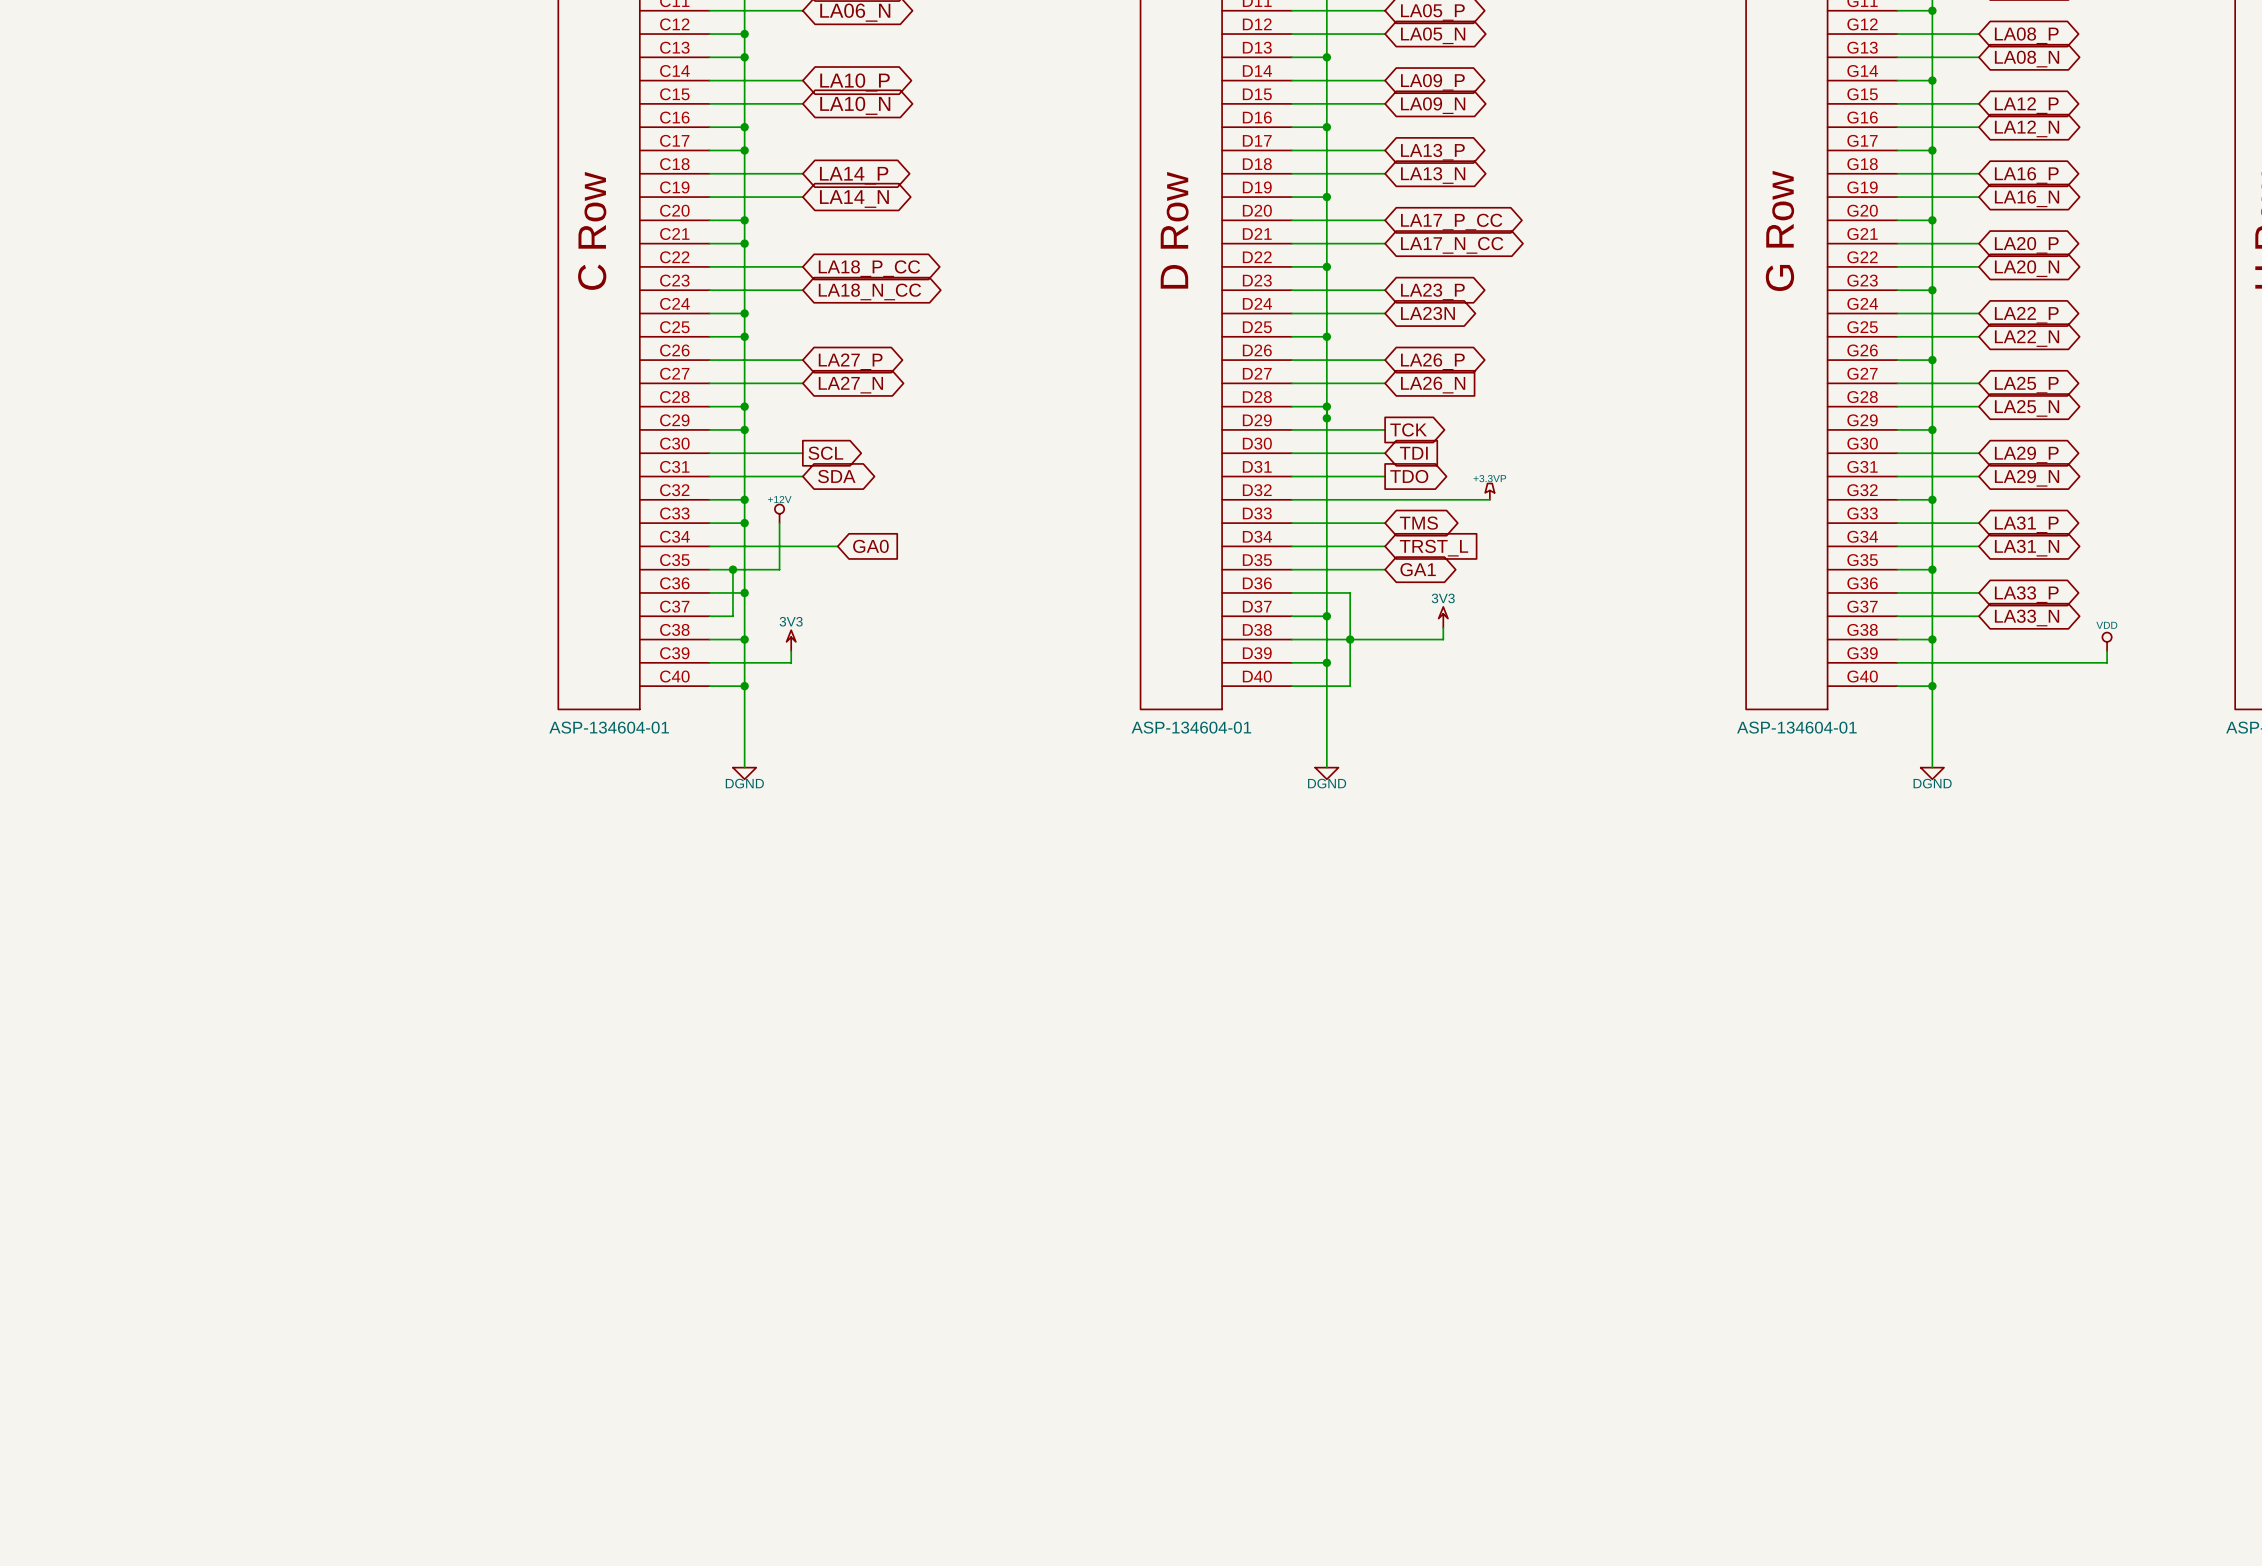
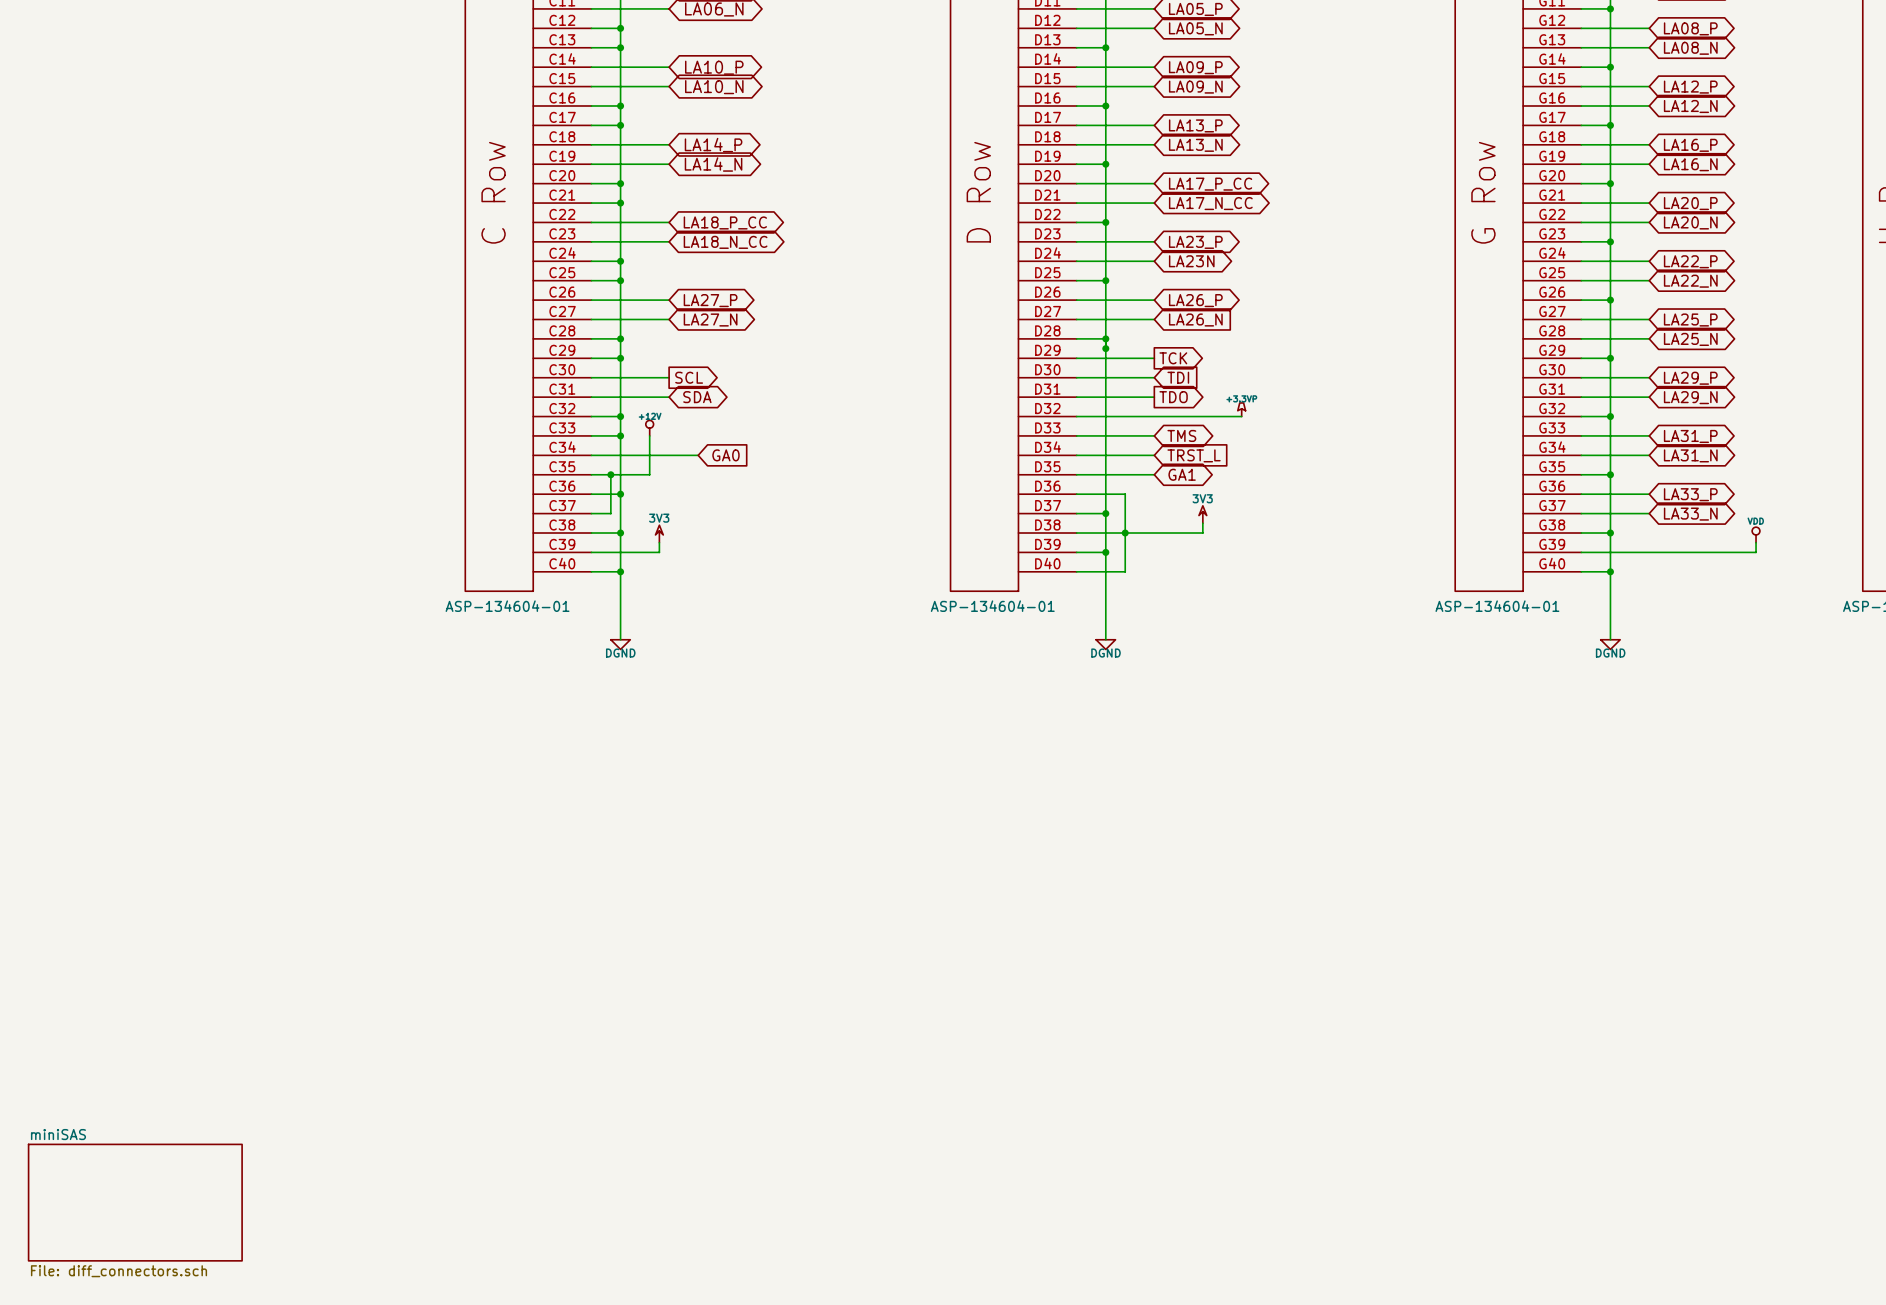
sheet miniSAS: none -> File: diff_connectors.sch (135, 1202)

